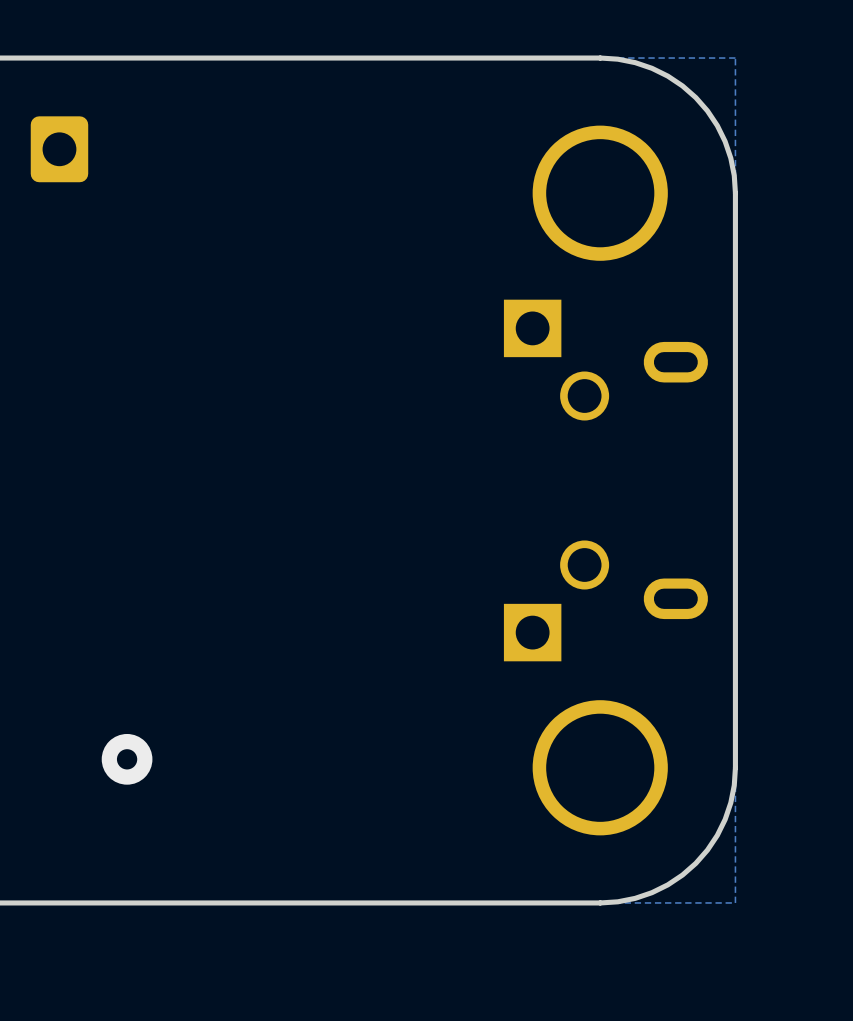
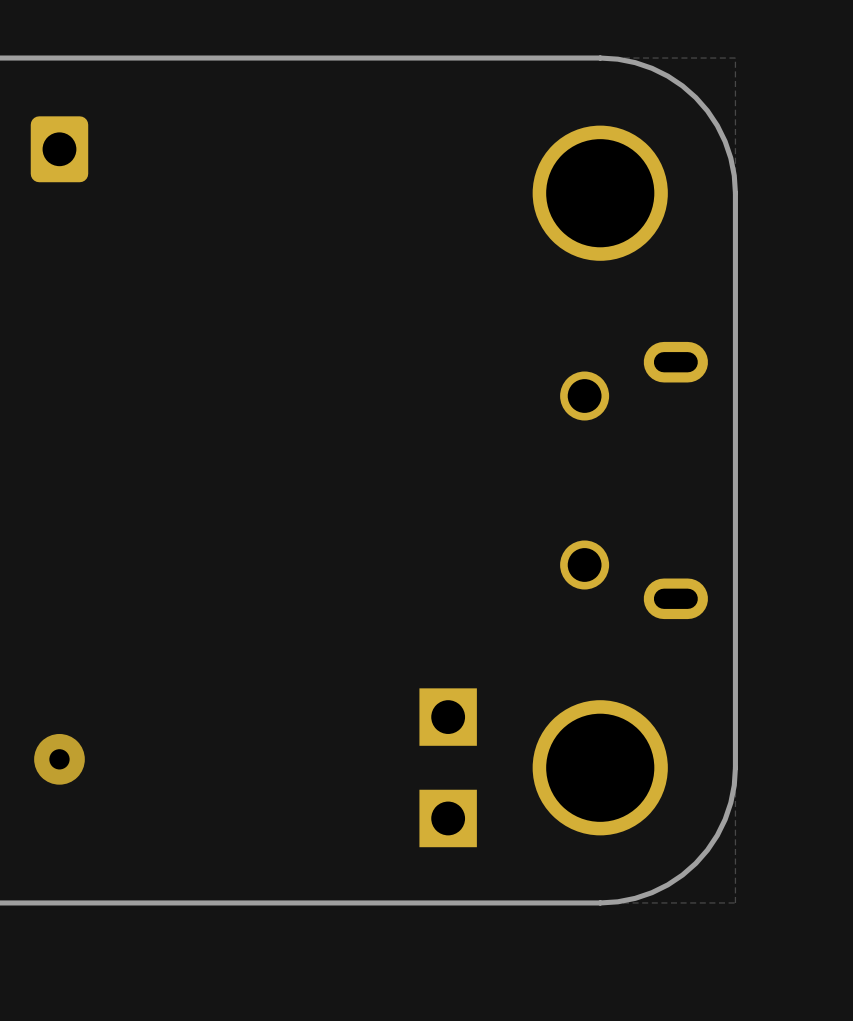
part: (532, 328) -> none
part: (532, 632) -> none
part: none -> (448, 717)
via position: (127, 759) -> (59, 759)
part: none -> (448, 818)

